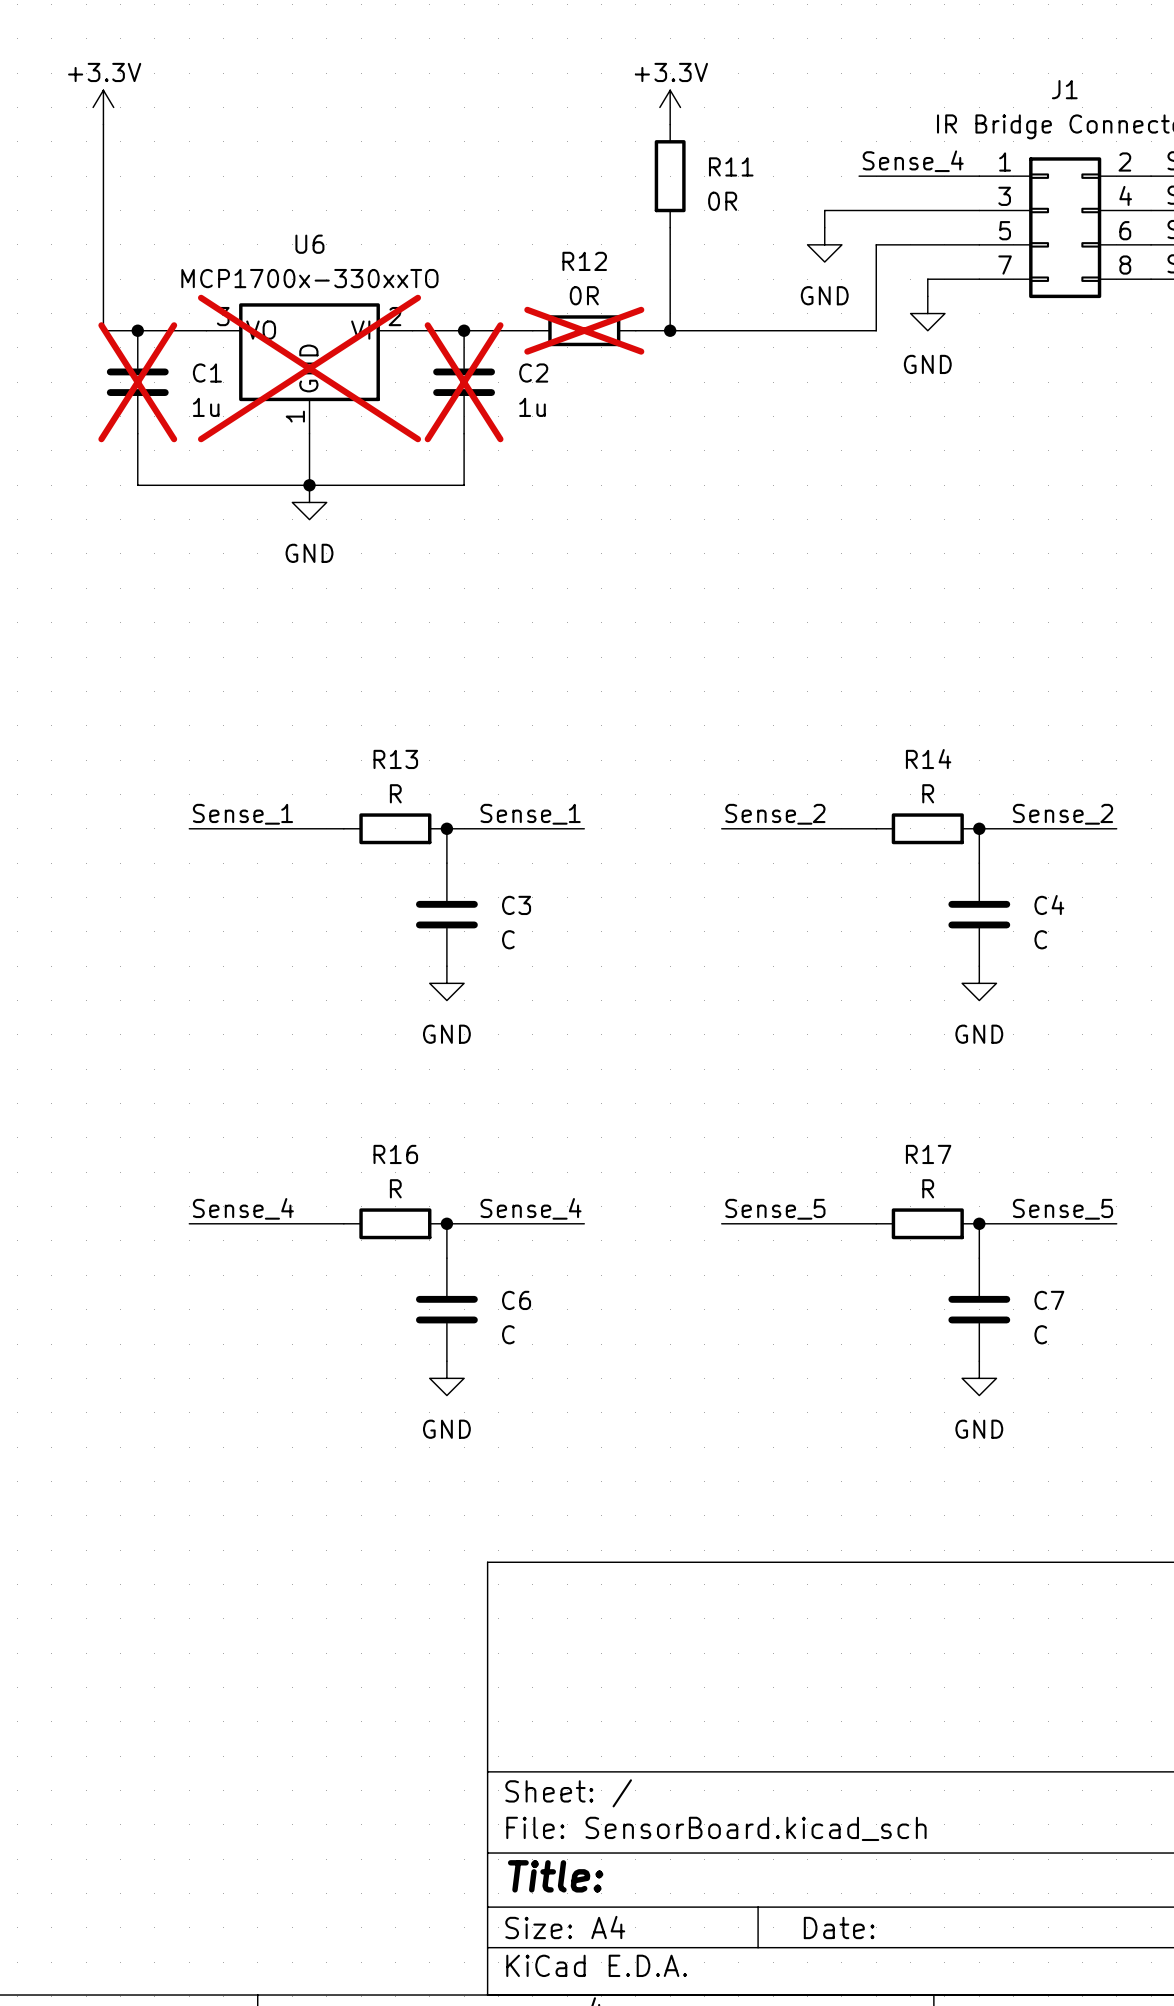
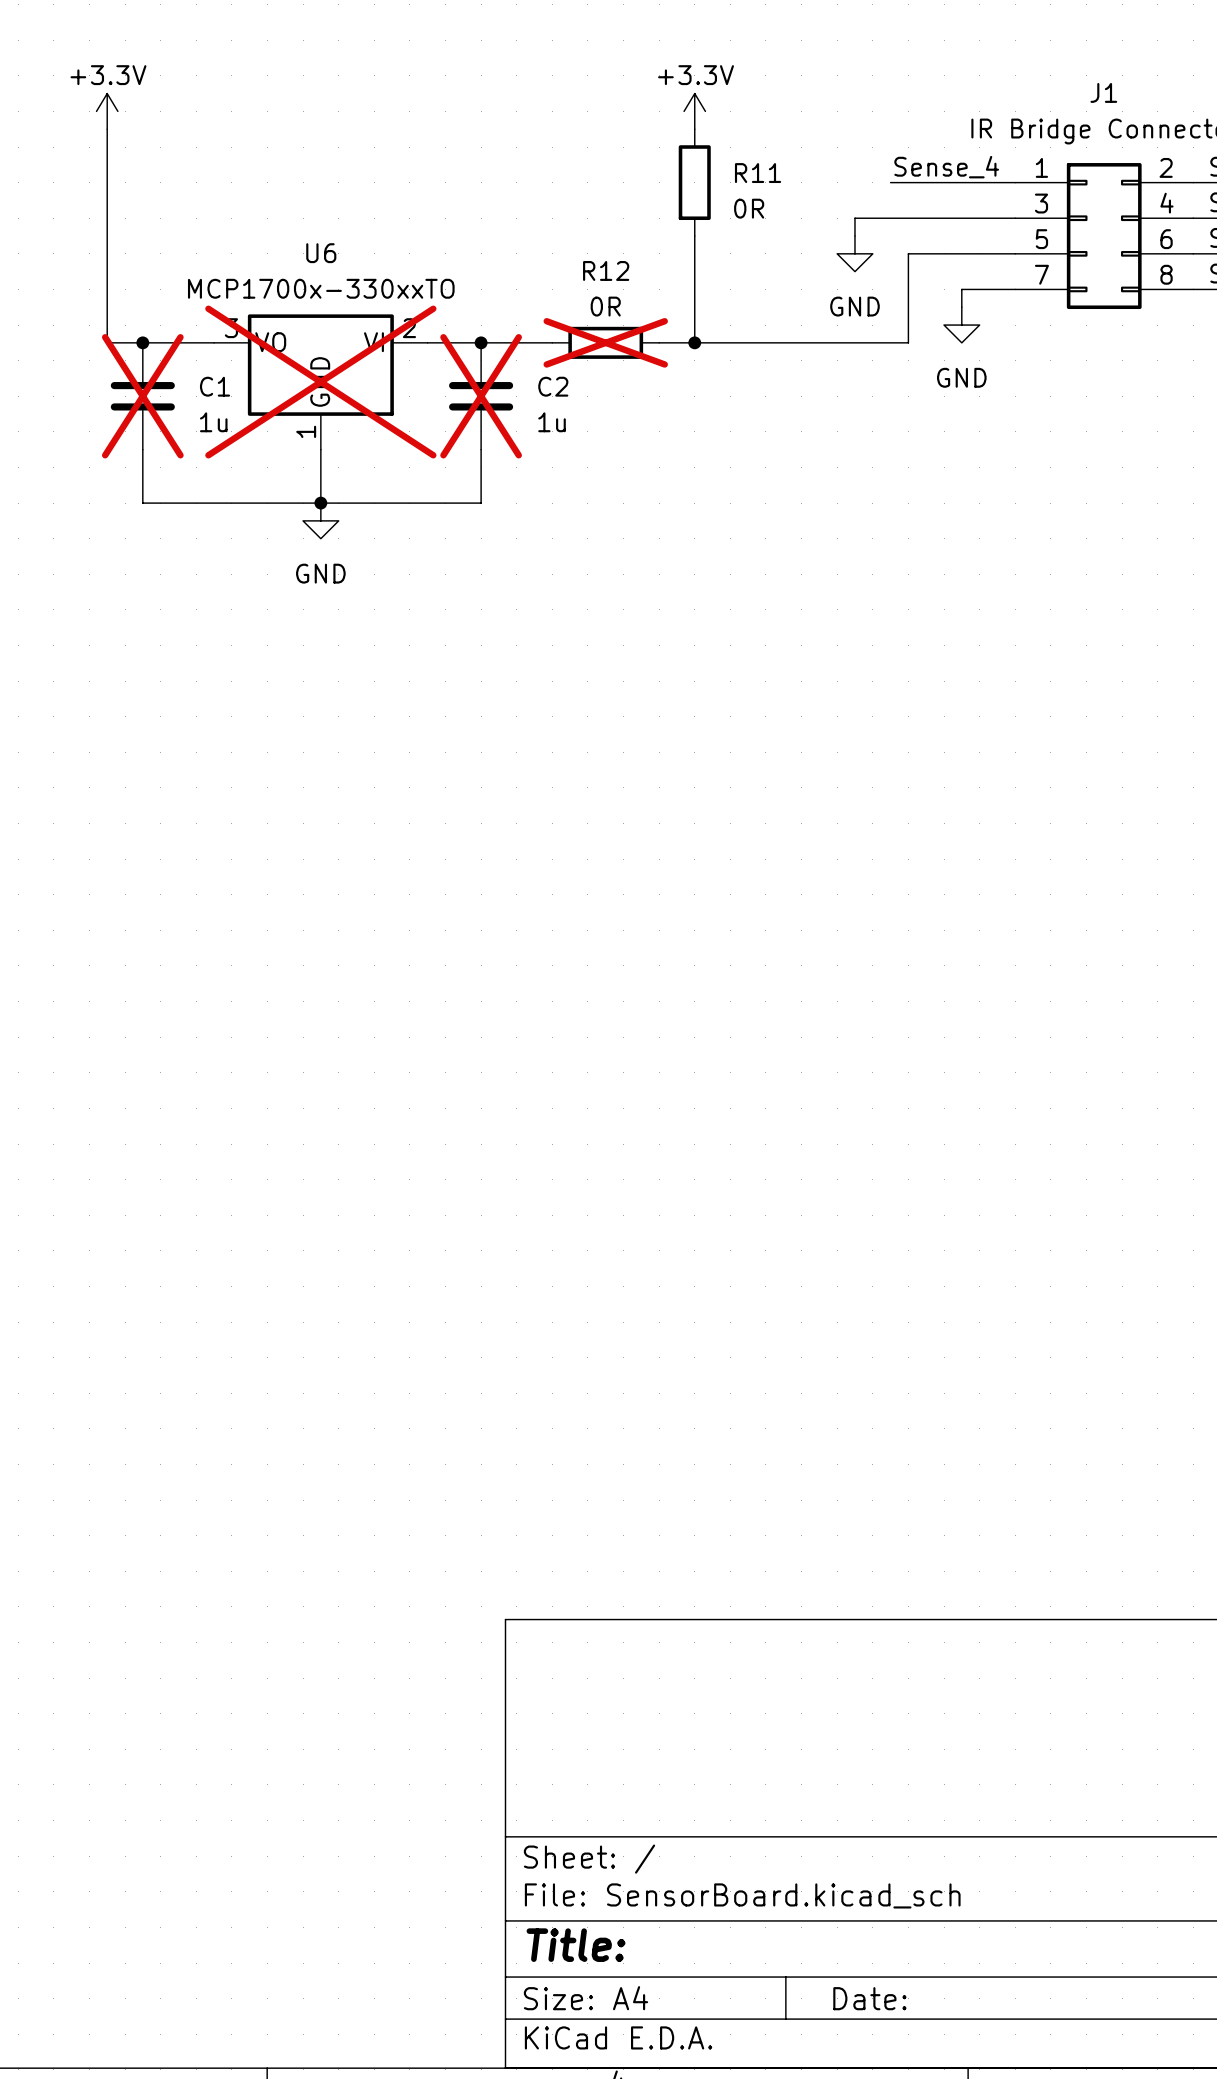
label: Sense_1 (242, 814) -> none
label: Sense_1 (530, 814) -> none
label: Sense_2 (775, 814) -> none
label: Sense_2 (1063, 814) -> none
wire: (189, 828) (343, 828) -> none
R13: R (395, 828) -> none
junction: (446, 828) -> none
wire: (584, 828) (446, 828) (446, 863) -> none
wire: (721, 828) (876, 828) -> none
R14: R (927, 828) -> none
junction: (979, 828) -> none
wire: (1116, 828) (979, 828) (979, 863) -> none
C3: C (446, 914) -> none
C4: C (979, 914) -> none
power symbol: GND (446, 983) -> none
power symbol: GND (979, 983) -> none
label: Sense_4 (243, 1208) -> none
label: Sense_4 (531, 1208) -> none
label: Sense_5 (775, 1209) -> none
label: Sense_5 (1063, 1209) -> none
wire: (189, 1223) (343, 1223) -> none
R16: R (395, 1223) -> none
junction: (446, 1223) -> none
wire: (584, 1223) (446, 1223) (446, 1258) -> none
wire: (721, 1223) (876, 1223) -> none
R17: R (927, 1223) -> none
junction: (979, 1223) -> none
wire: (1116, 1223) (979, 1223) (979, 1258) -> none
C6: C (446, 1309) -> none
C7: C (979, 1309) -> none
power symbol: GND (446, 1378) -> none
power symbol: GND (979, 1378) -> none

